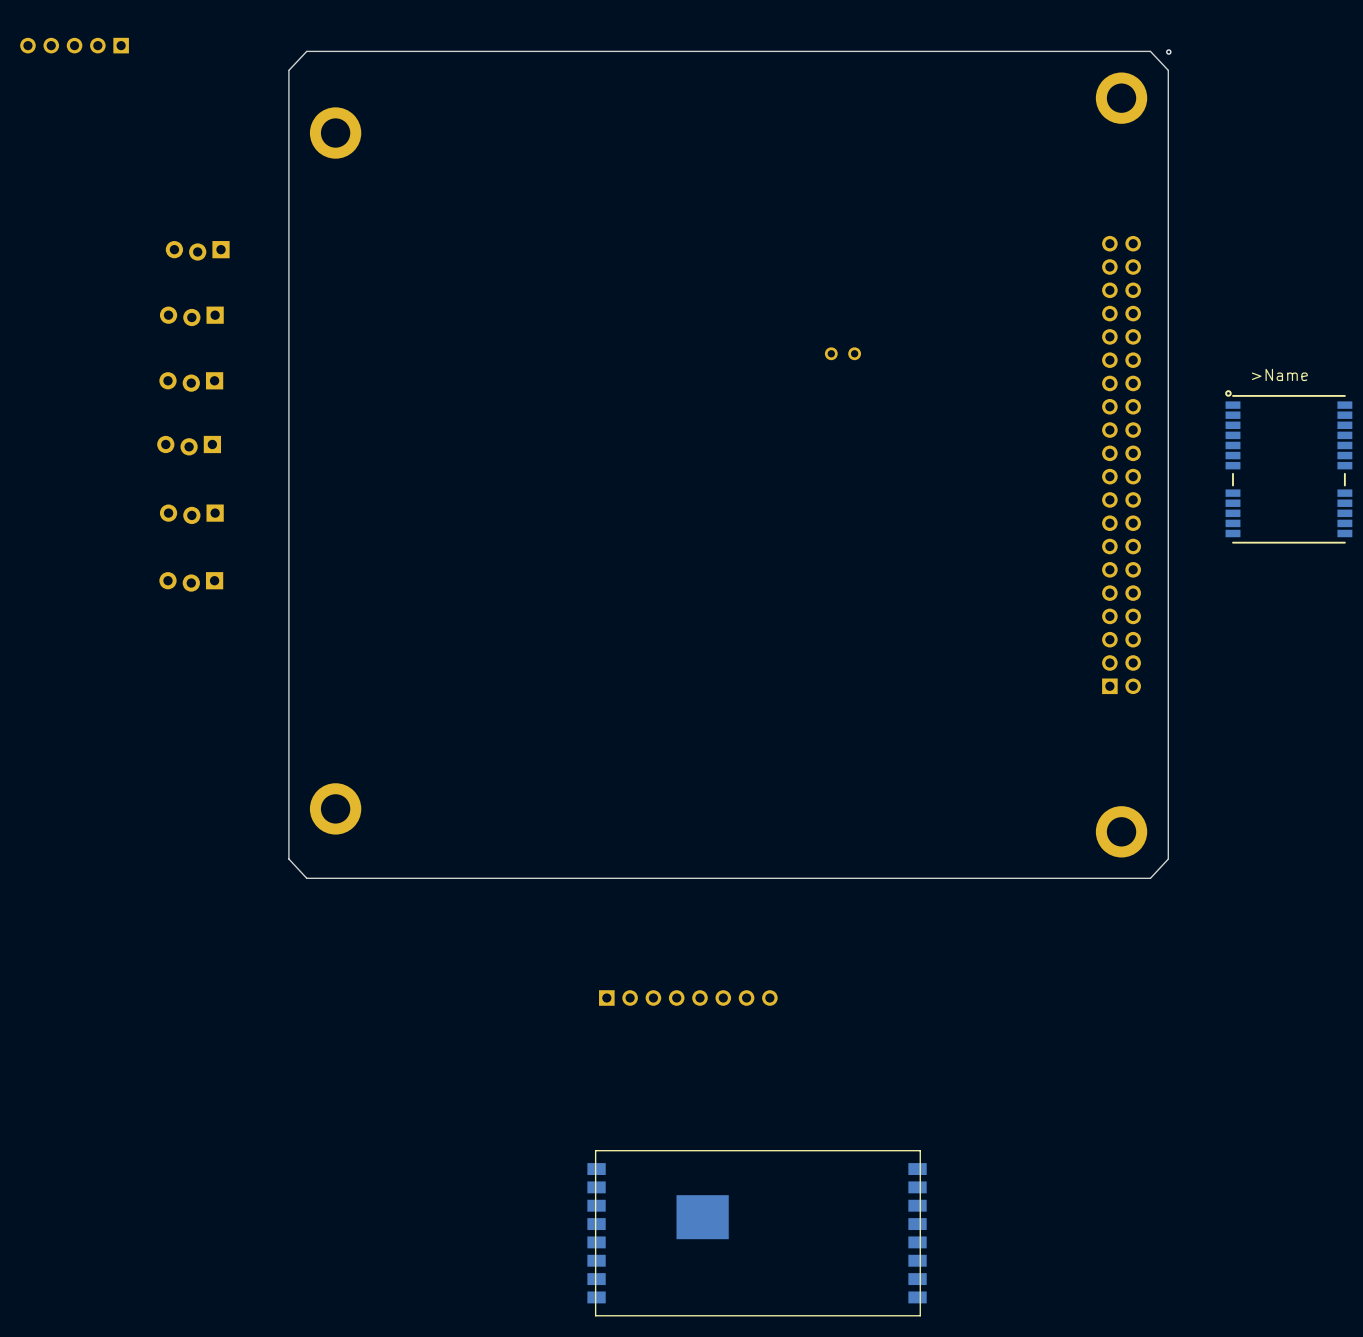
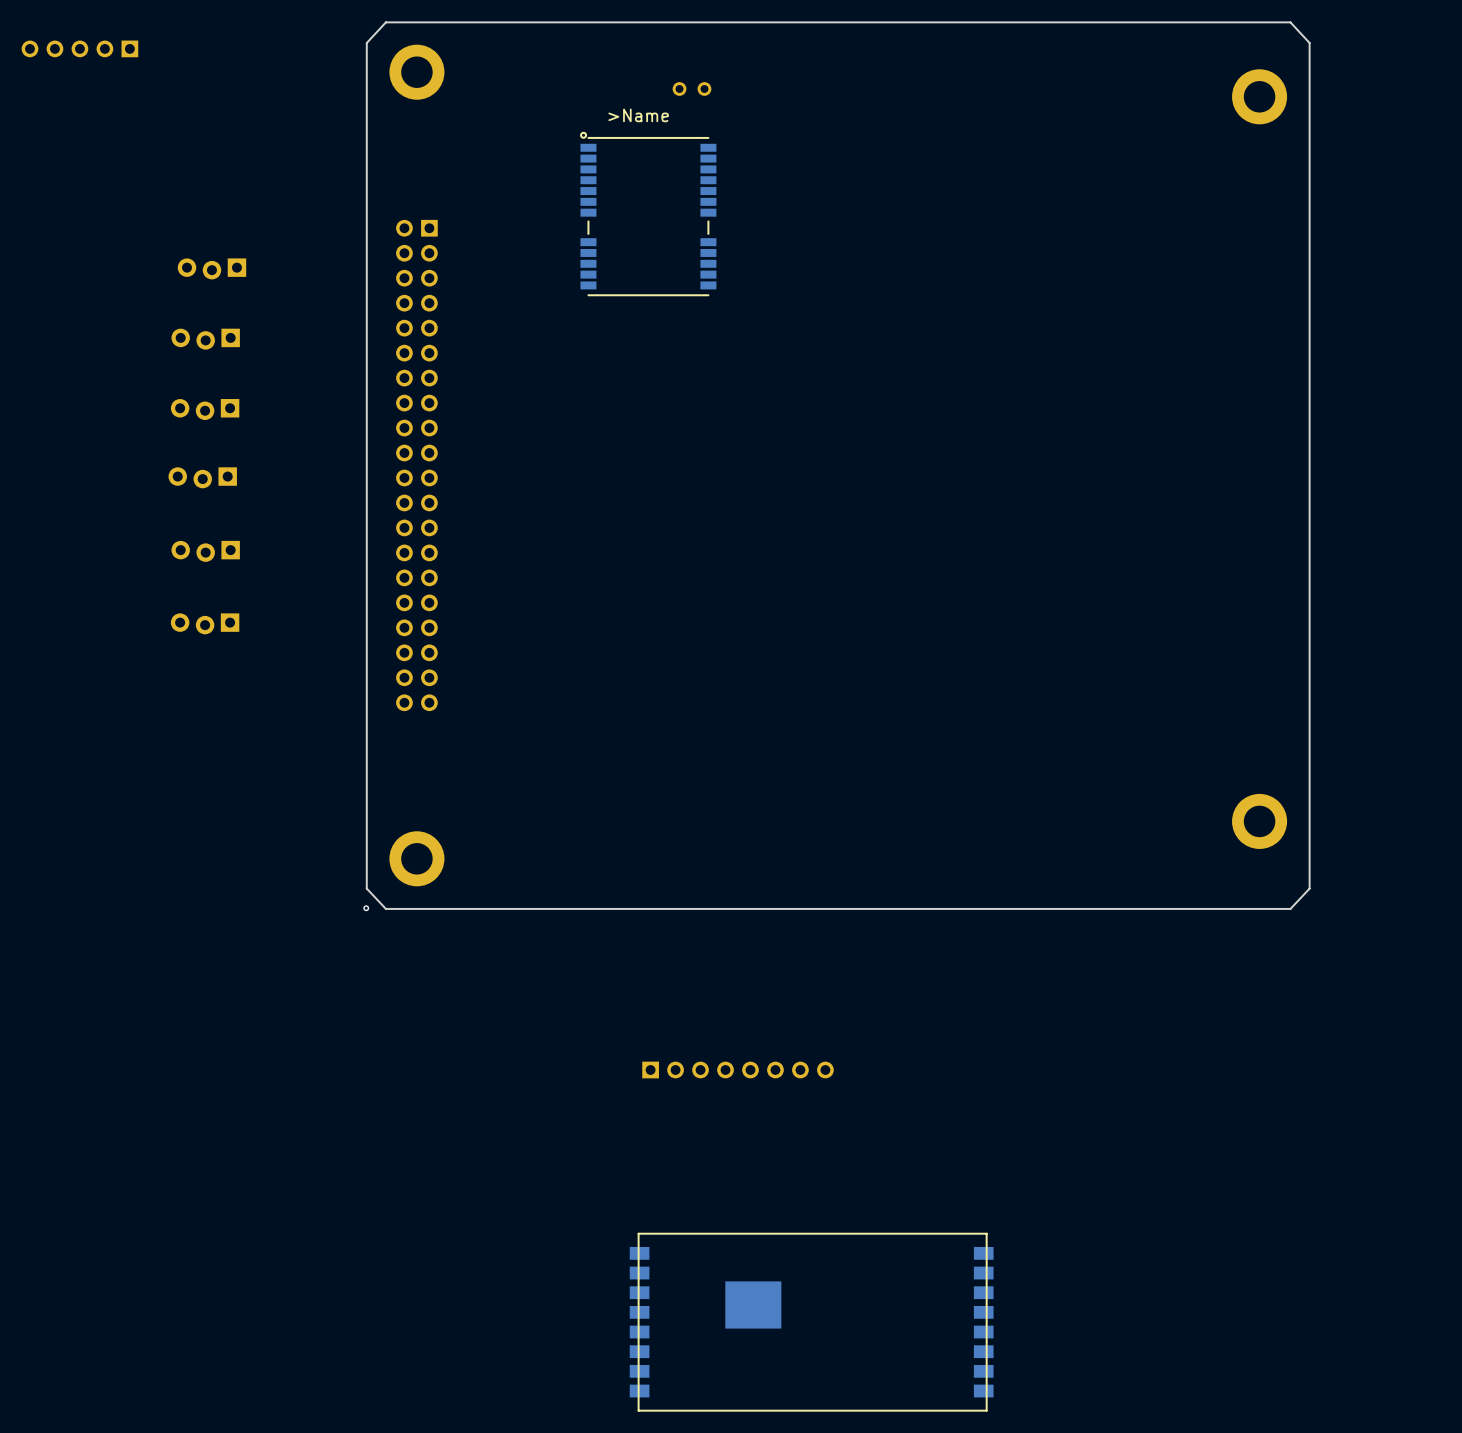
board edge: (1150, 51) (306, 51) (288, 70) (288, 859) (306, 878) (1150, 878) (1168, 859) (1168, 70) (1150, 51) -> (1290, 22) (1309, 43) (1309, 888) (1290, 908) (385, 908) (366, 888) (366, 43) (385, 22) (1290, 22)
via: (1168, 52) -> none
part: none -> (691, 88)
part position: (1121, 98) -> (1259, 96)
part position: (335, 133) -> (416, 72)
part: none -> (648, 214)
part: (842, 353) -> none
part: none -> (416, 465)
part: (1121, 464) -> none
part: (1288, 466) -> none
part position: (335, 808) -> (416, 858)
part position: (1121, 831) -> (1259, 821)
via: none -> (366, 908)

